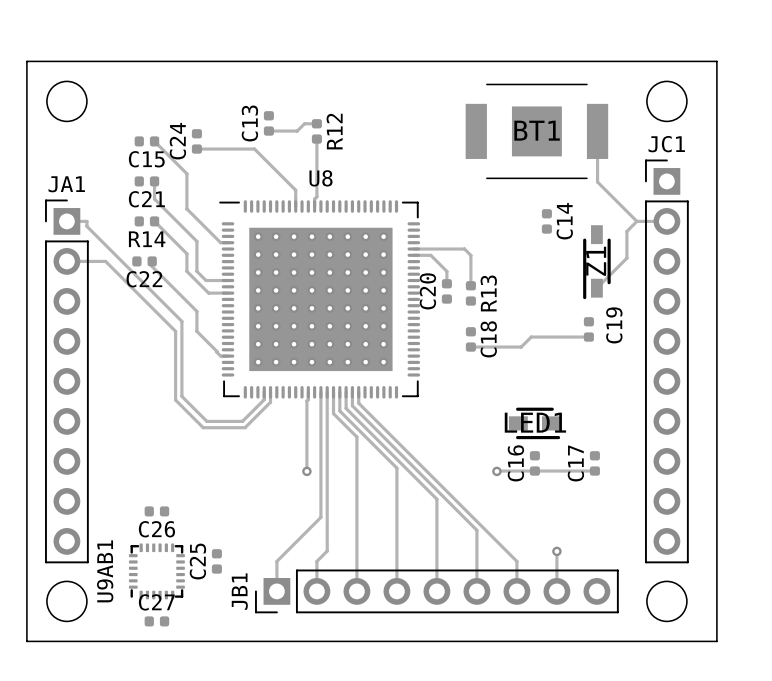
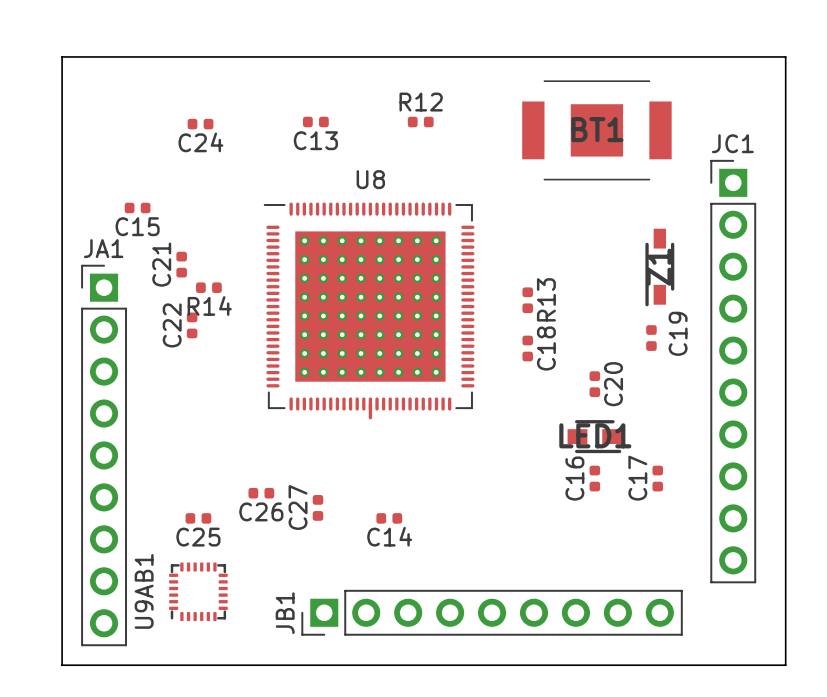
round board edge: [46, 80, 88, 123] -> none
round board edge: [646, 80, 688, 123] -> none
C13 rotation: 0° (268, 123) -> 90° clockwise (315, 121)
track: (316, 123) (304, 123) (297, 131) (268, 131) -> none
R12 rotation: 0° (316, 131) -> 90° clockwise (420, 121)
R12 position: (316, 131) -> (420, 121)
track: (597, 131) (597, 182) (636, 221) -> none
track: (316, 139) (316, 196) (314, 199) (314, 206) -> none
C15 position: (146, 141) -> (137, 207)
track: (154, 141) (186, 173) (186, 208) (220, 242) (228, 242) -> none
C24 rotation: 0° (196, 141) -> 90° clockwise (200, 124)
C24 position: (196, 141) -> (200, 124)
track: (196, 149) (254, 149) (295, 190) (295, 206) -> none
C21 rotation: 0° (146, 181) -> 90° clockwise (181, 264)
C21 position: (146, 181) -> (181, 264)
track: (154, 181) (154, 199) (196, 241) (196, 271) (206, 280) (228, 280) -> none
track: (66, 221) (86, 221) (86, 226) (181, 321) (181, 396) (206, 421) (242, 421) (264, 399) (264, 392) -> none
R14 position: (146, 221) -> (208, 287)
track: (154, 221) (186, 253) (186, 271) (208, 293) (228, 293) -> none
C14 rotation: 0° (546, 221) -> 90° clockwise (389, 518)
C14 position: (546, 221) -> (389, 518)
track: (636, 221) (666, 221) -> none
track: (636, 221) (626, 231) (626, 258) (596, 288) -> none
track: (413, 249) (464, 249) (470, 255) (470, 285) -> none
track: (413, 255) (430, 255) (446, 271) (446, 283) -> none
track: (66, 261) (105, 261) (175, 331) (175, 400) (203, 427) (245, 427) (270, 402) (270, 392) -> none
C22 rotation: 0° (144, 261) -> 90° clockwise (192, 325)
C22 position: (144, 261) -> (192, 325)
track: (152, 261) (152, 266) (196, 311) (196, 331) (220, 356) (228, 356) -> none
C20 name position: C20 (427, 291) -> C20 (613, 384)
C20 position: (446, 291) -> (594, 384)
track: (588, 337) (531, 337) (521, 347) (470, 347) -> none
JA1 position: (66, 381) -> (104, 455)
track: (308, 392) (306, 471) -> none
track: (327, 392) (327, 551) (316, 561) (316, 591) -> none
track: (333, 392) (333, 413) (356, 437) (356, 591) -> none
track: (339, 392) (339, 411) (396, 468) (396, 591) -> none
track: (346, 392) (346, 408) (436, 499) (436, 591) -> none
track: (352, 392) (352, 405) (476, 530) (476, 591) -> none
track: (358, 392) (358, 403) (516, 561) (516, 591) -> none
track: (320, 405) (320, 517) (276, 561) (276, 591) -> none
via: (306, 471) -> none
via: (496, 471) -> none
track: (594, 471) (496, 471) -> none
C26 position: (156, 511) -> (261, 493)
track: (556, 551) (556, 591) -> none
via: (556, 551) -> none
C25 rotation: 0° (216, 561) -> 90° clockwise (198, 518)
C25 position: (216, 561) -> (198, 518)
round board edge: [46, 580, 88, 623] -> none
round board edge: [646, 580, 688, 623] -> none
C27 rotation: 0° (156, 621) -> 90° clockwise (317, 507)
C27 position: (156, 621) -> (317, 507)

